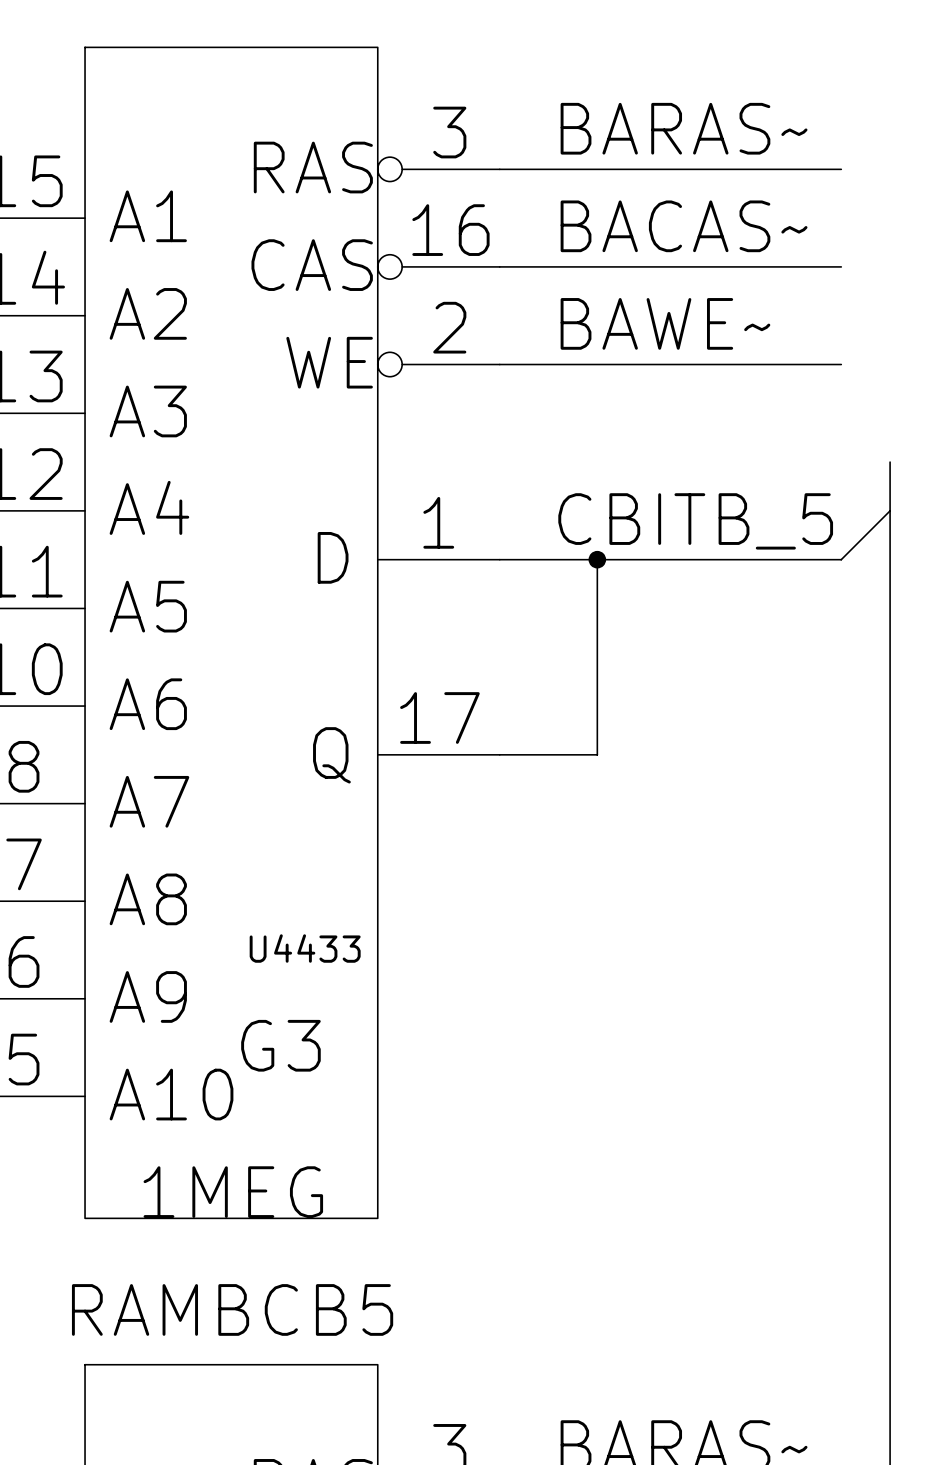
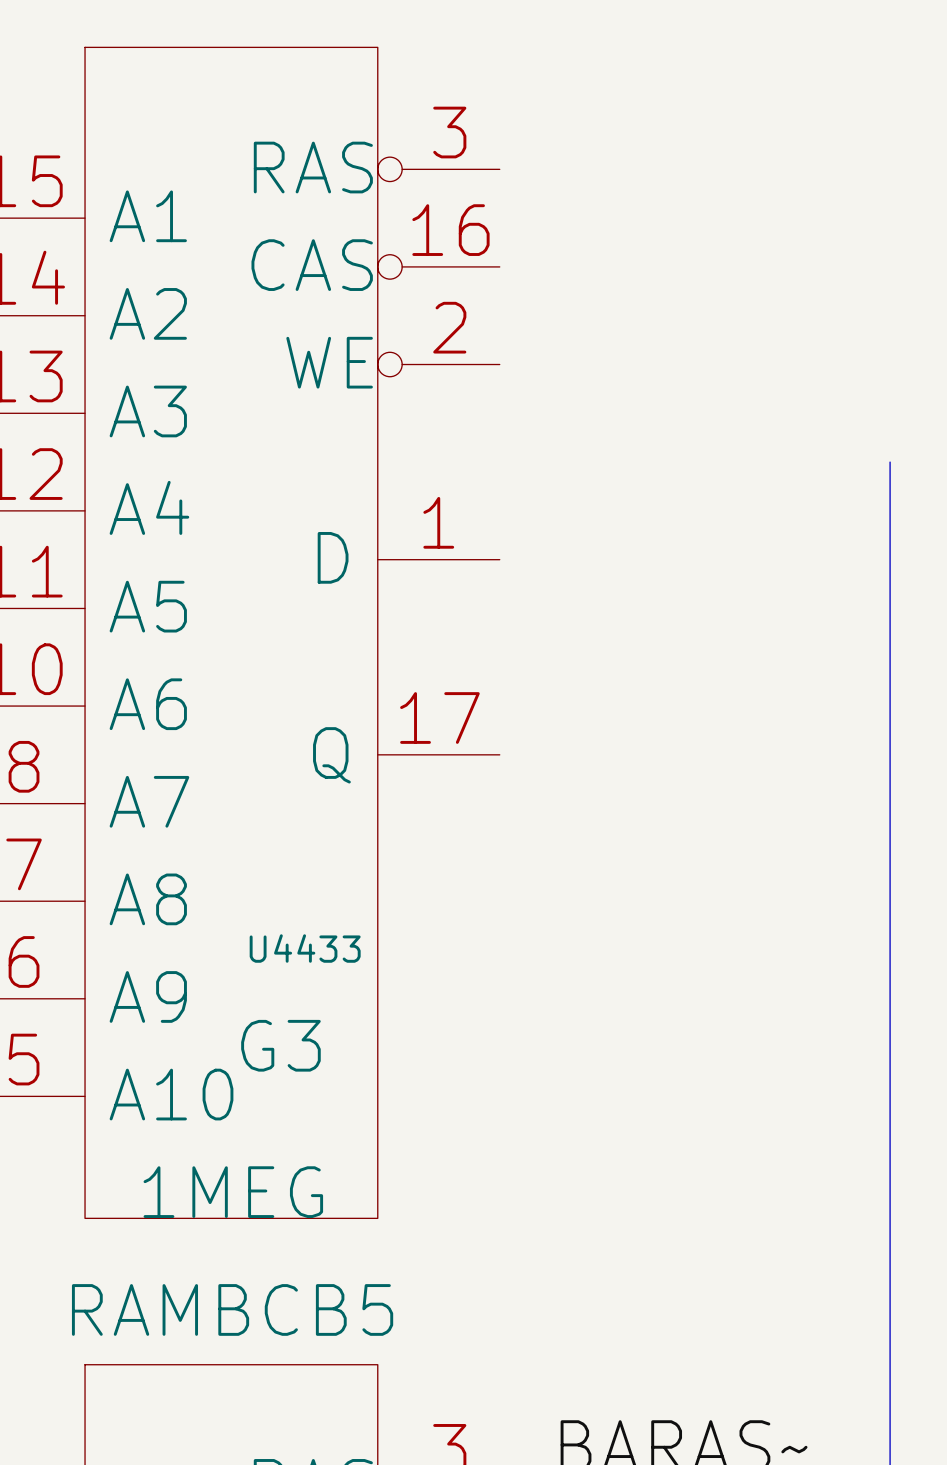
label: BARAS~ (684, 128) -> none
wire: (499, 169) (841, 169) -> none
label: BACAS~ (684, 226) -> none
wire: (499, 266) (841, 266) -> none
label: BAWE~ (665, 323) -> none
wire: (499, 364) (841, 364) -> none
wire: (890, 510) (841, 559) (499, 559) -> none
label: CBITB_5 (695, 521) -> none
wire: (597, 559) (597, 754) (499, 754) -> none
junction: (597, 559) -> none

